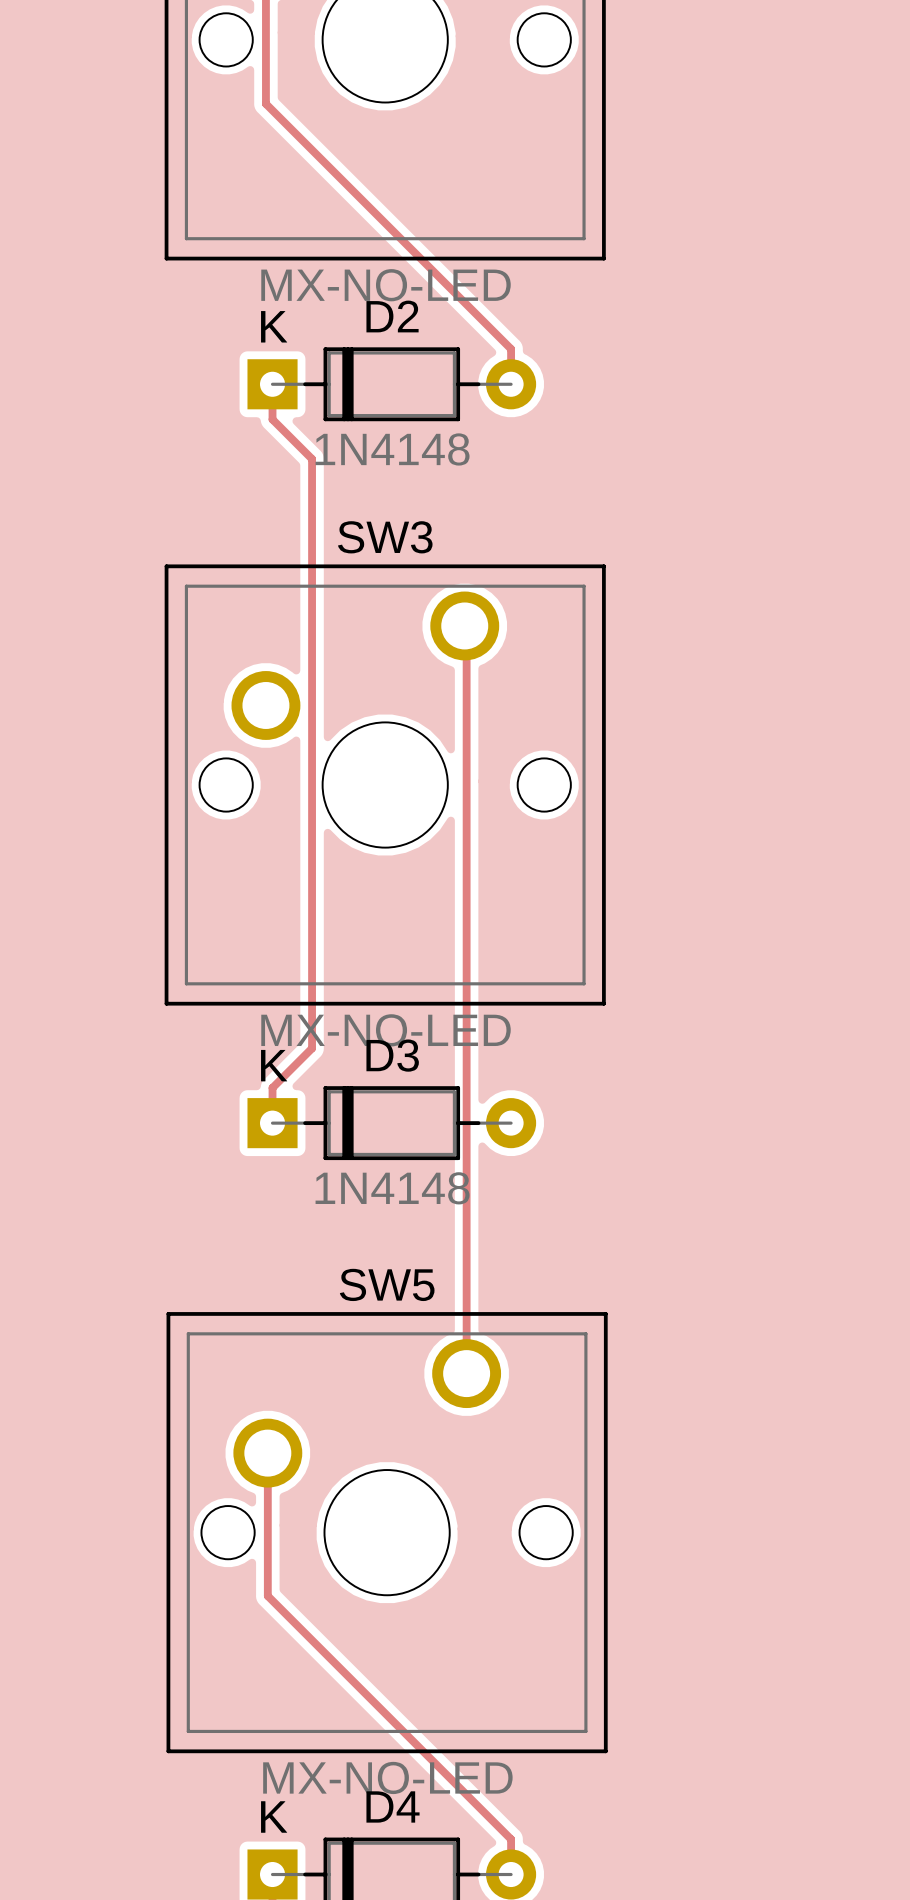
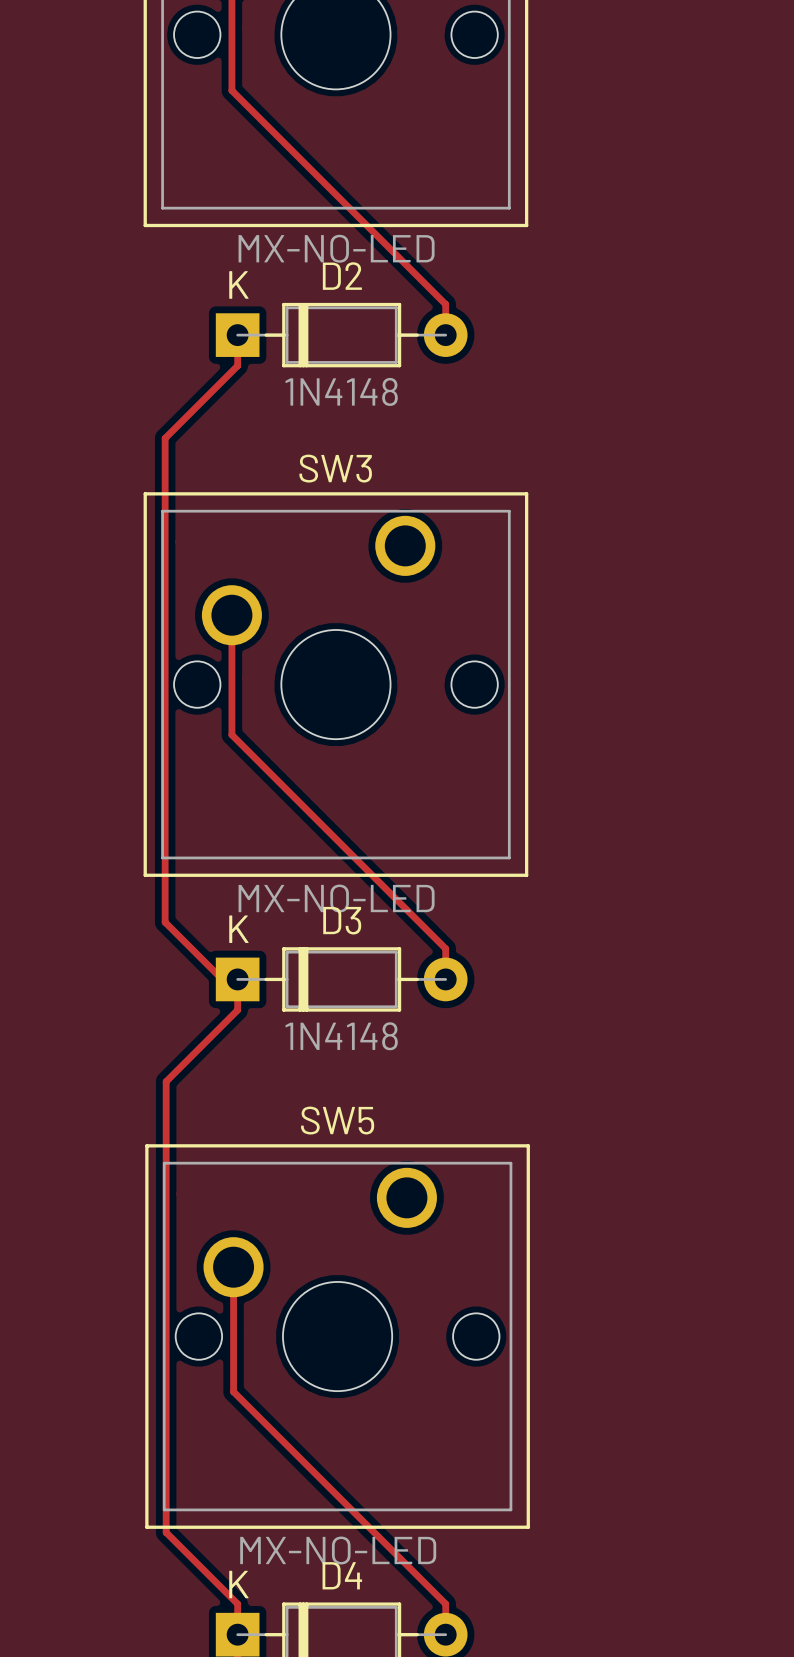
track: (272, 419) (312, 459) (312, 1048) (272, 1087) (272, 1123) -> (237, 365) (165, 438) (165, 922) (237, 994)
track: (464, 625) (466, 627) (466, 1373) -> none
track: none -> (231, 615) (231, 734) (445, 948) (445, 979)
track: none -> (237, 979) (237, 1010) (166, 1081) (166, 1532) (237, 1603) (237, 1634)

